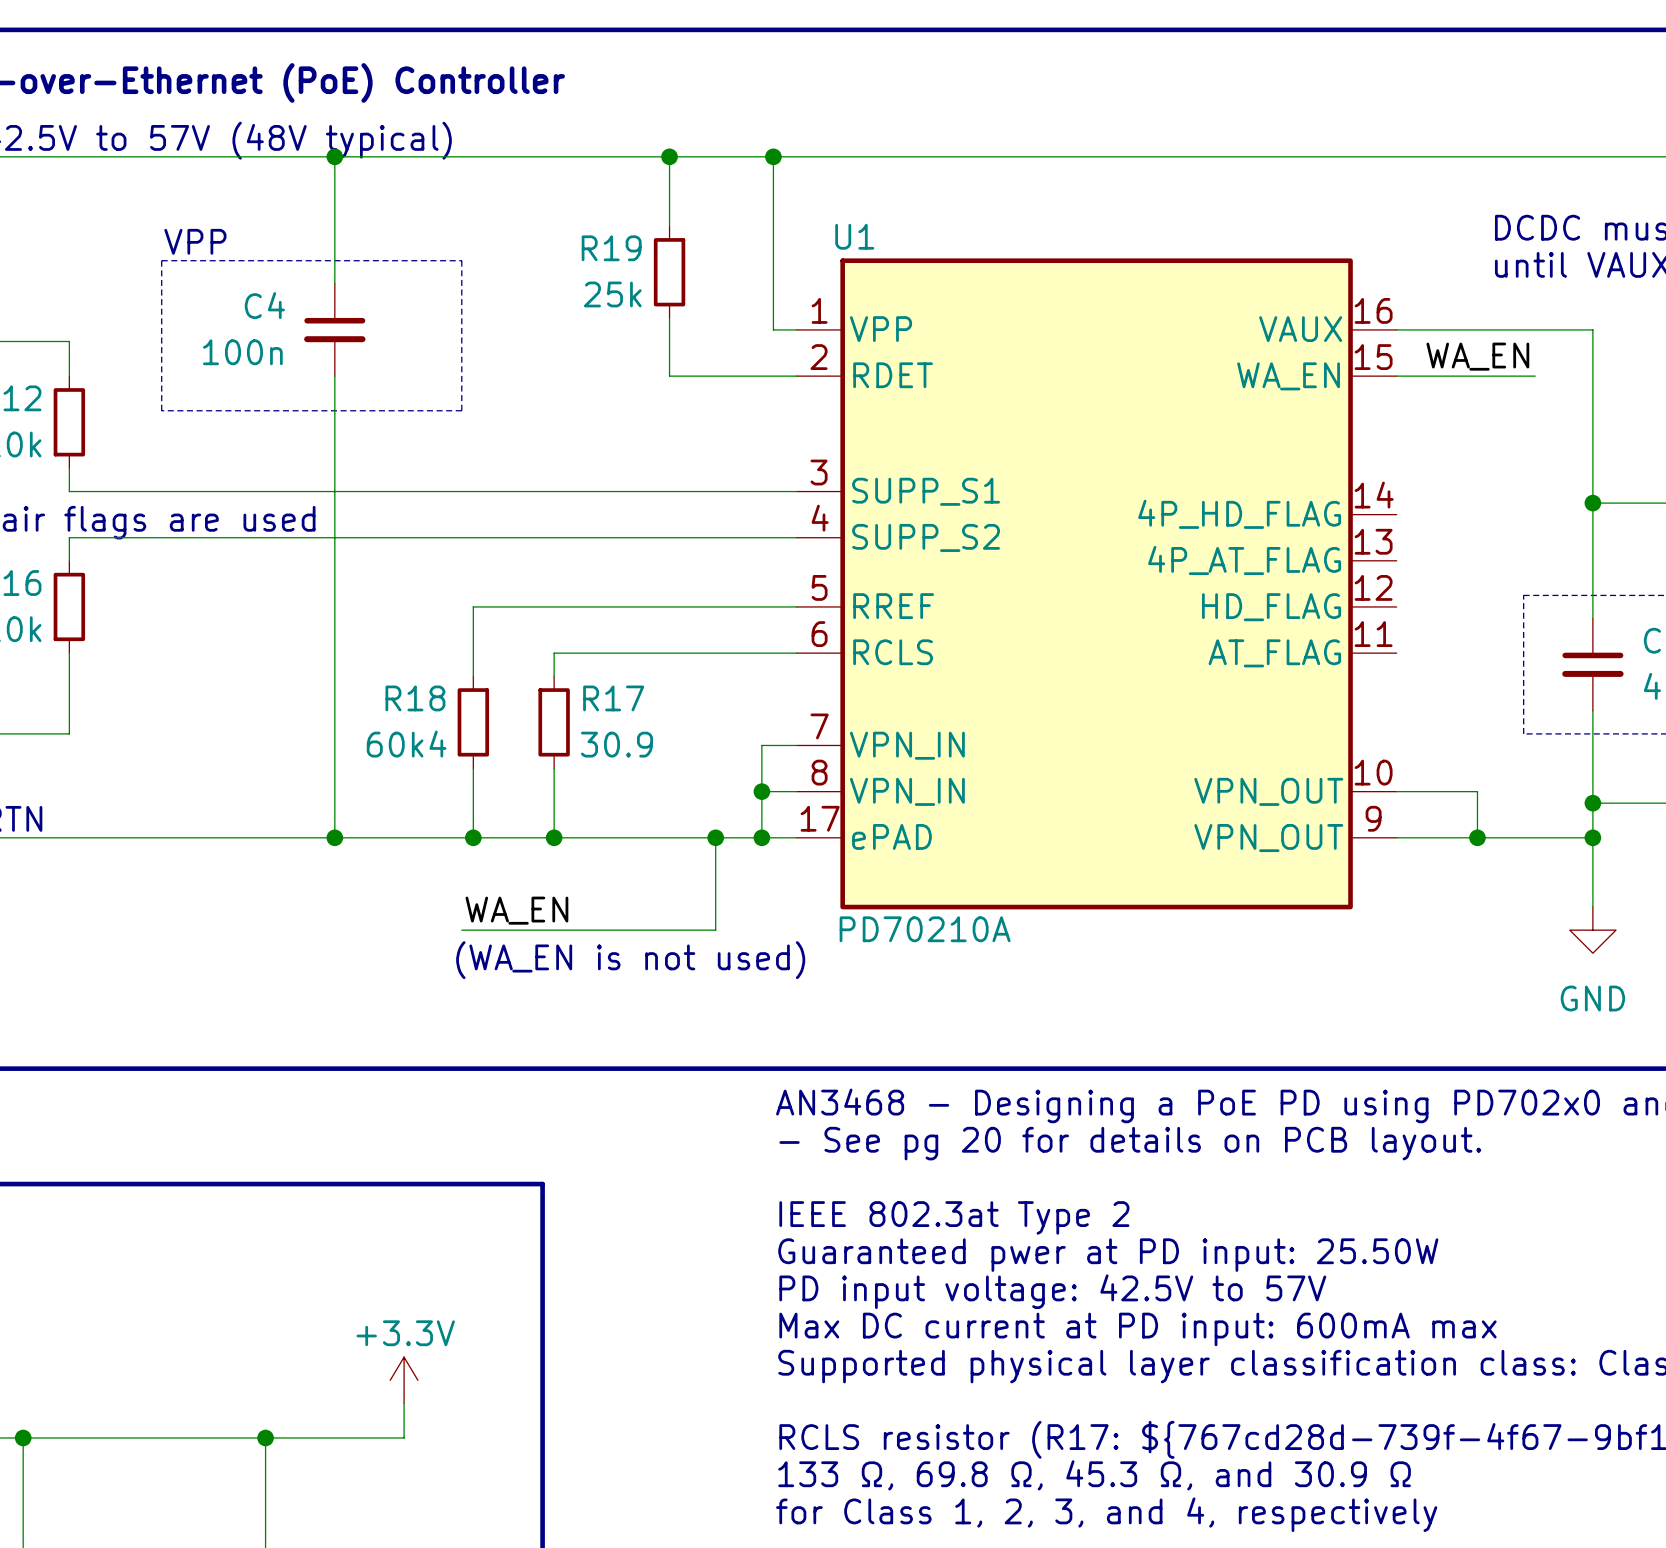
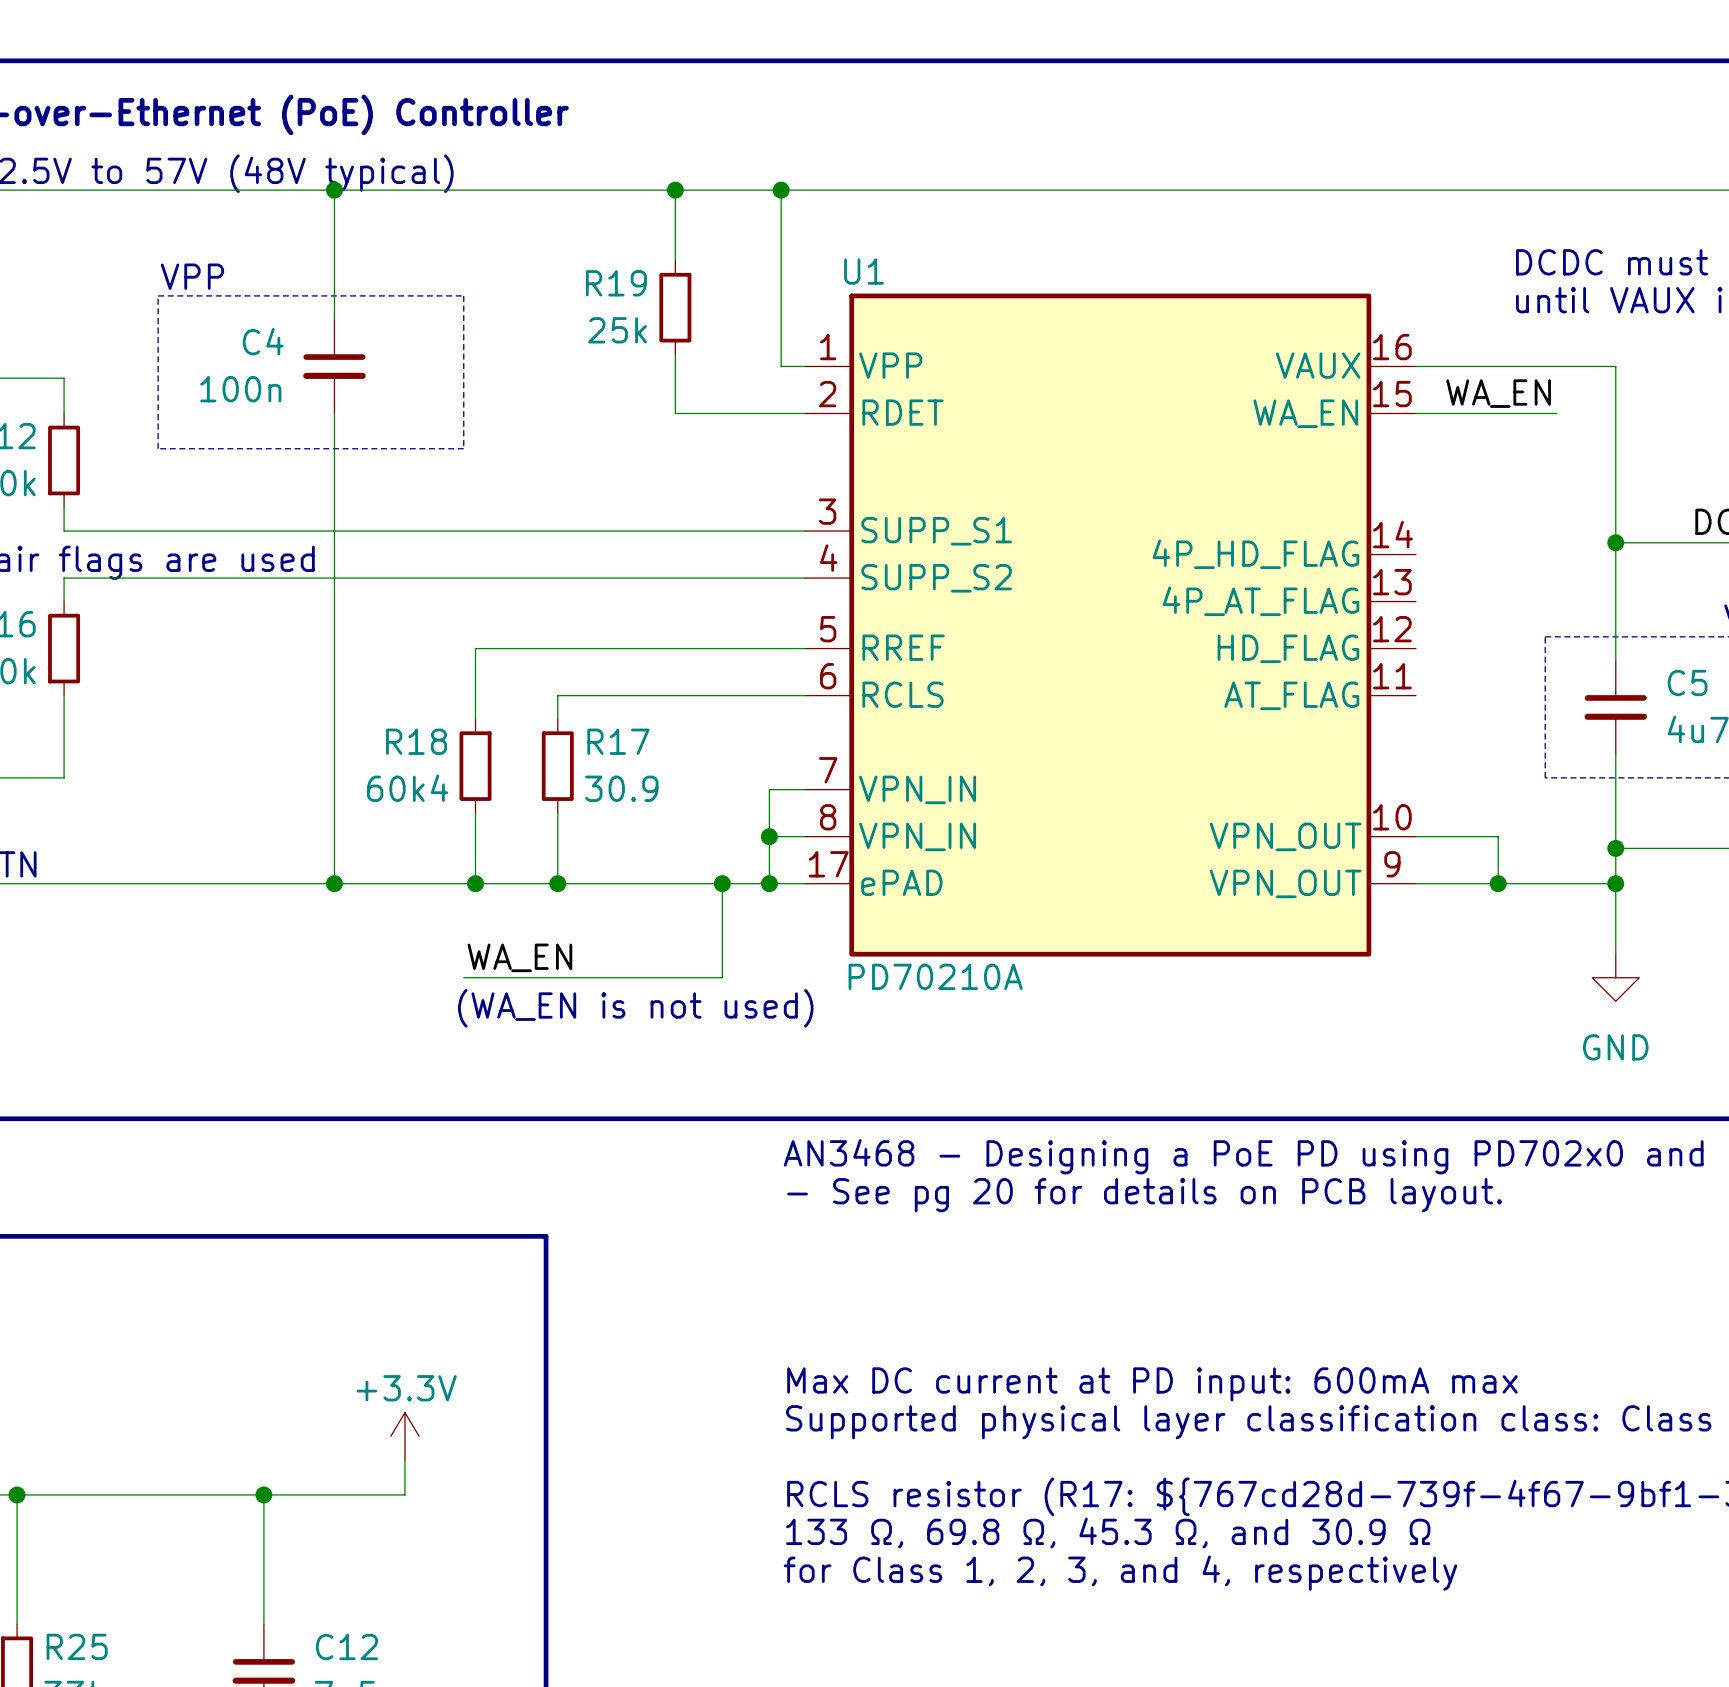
text: IEEE 802.3at Type 2 (954, 1217) -> none
text: Guaranteed pwer at PD input: 25.50W (1108, 1255) -> none
text: PD input voltage: 42.5V to 57V (1052, 1291) -> none

